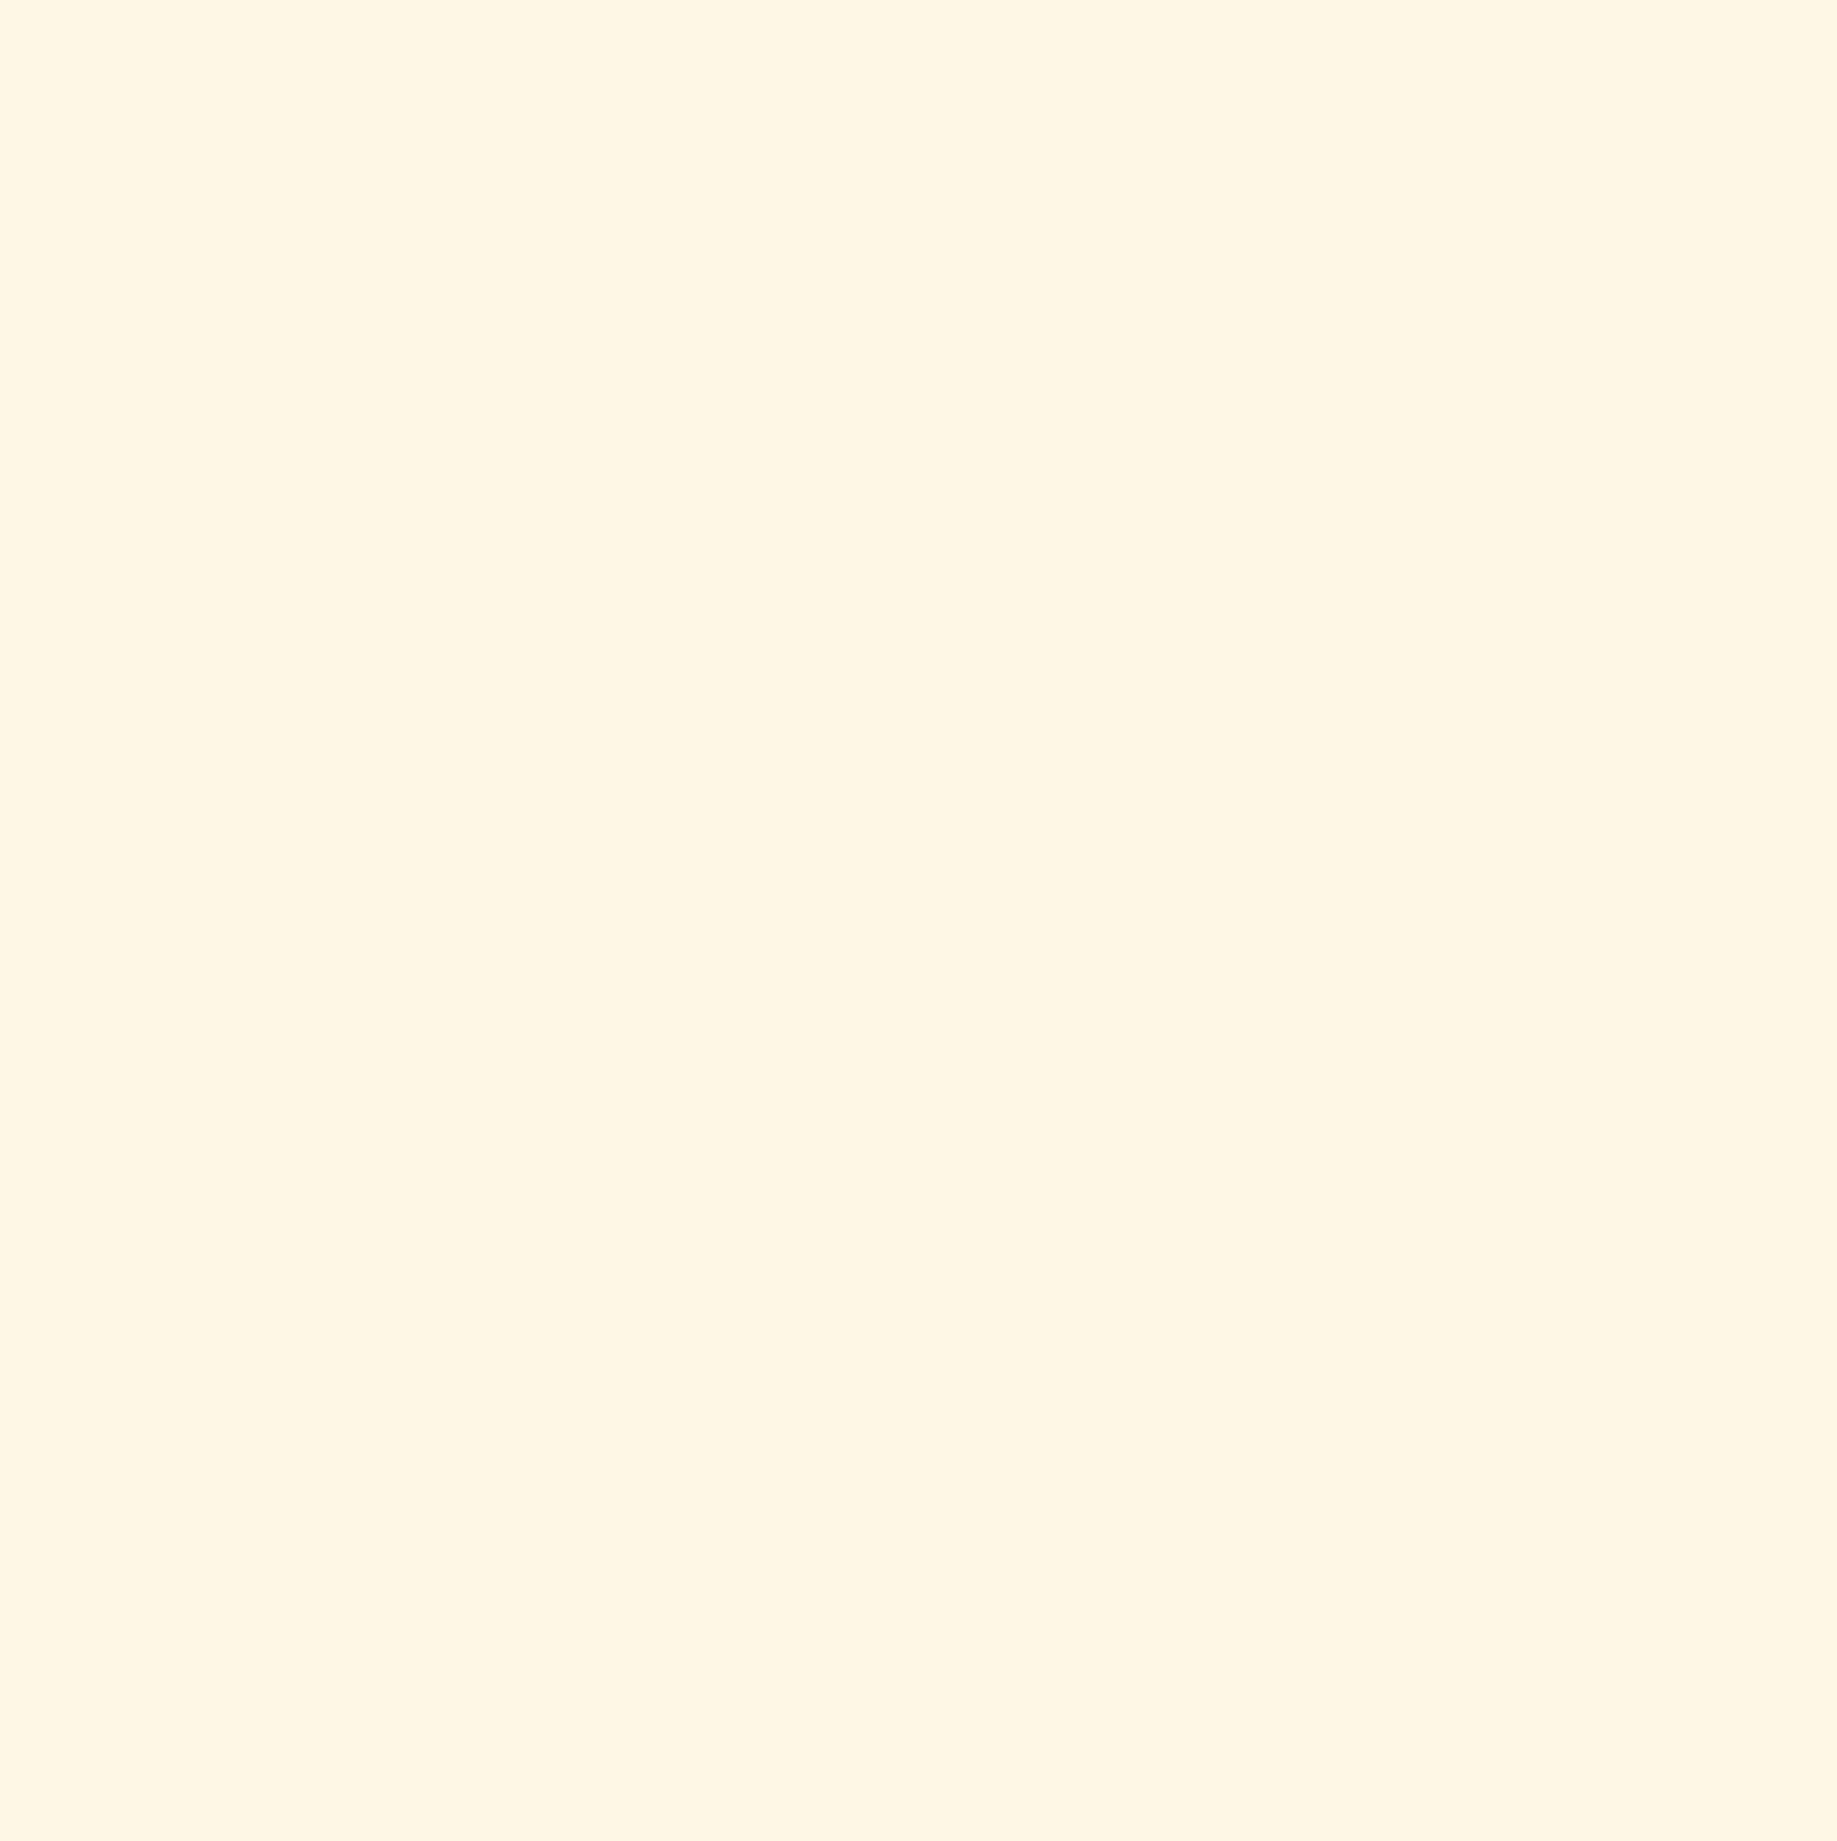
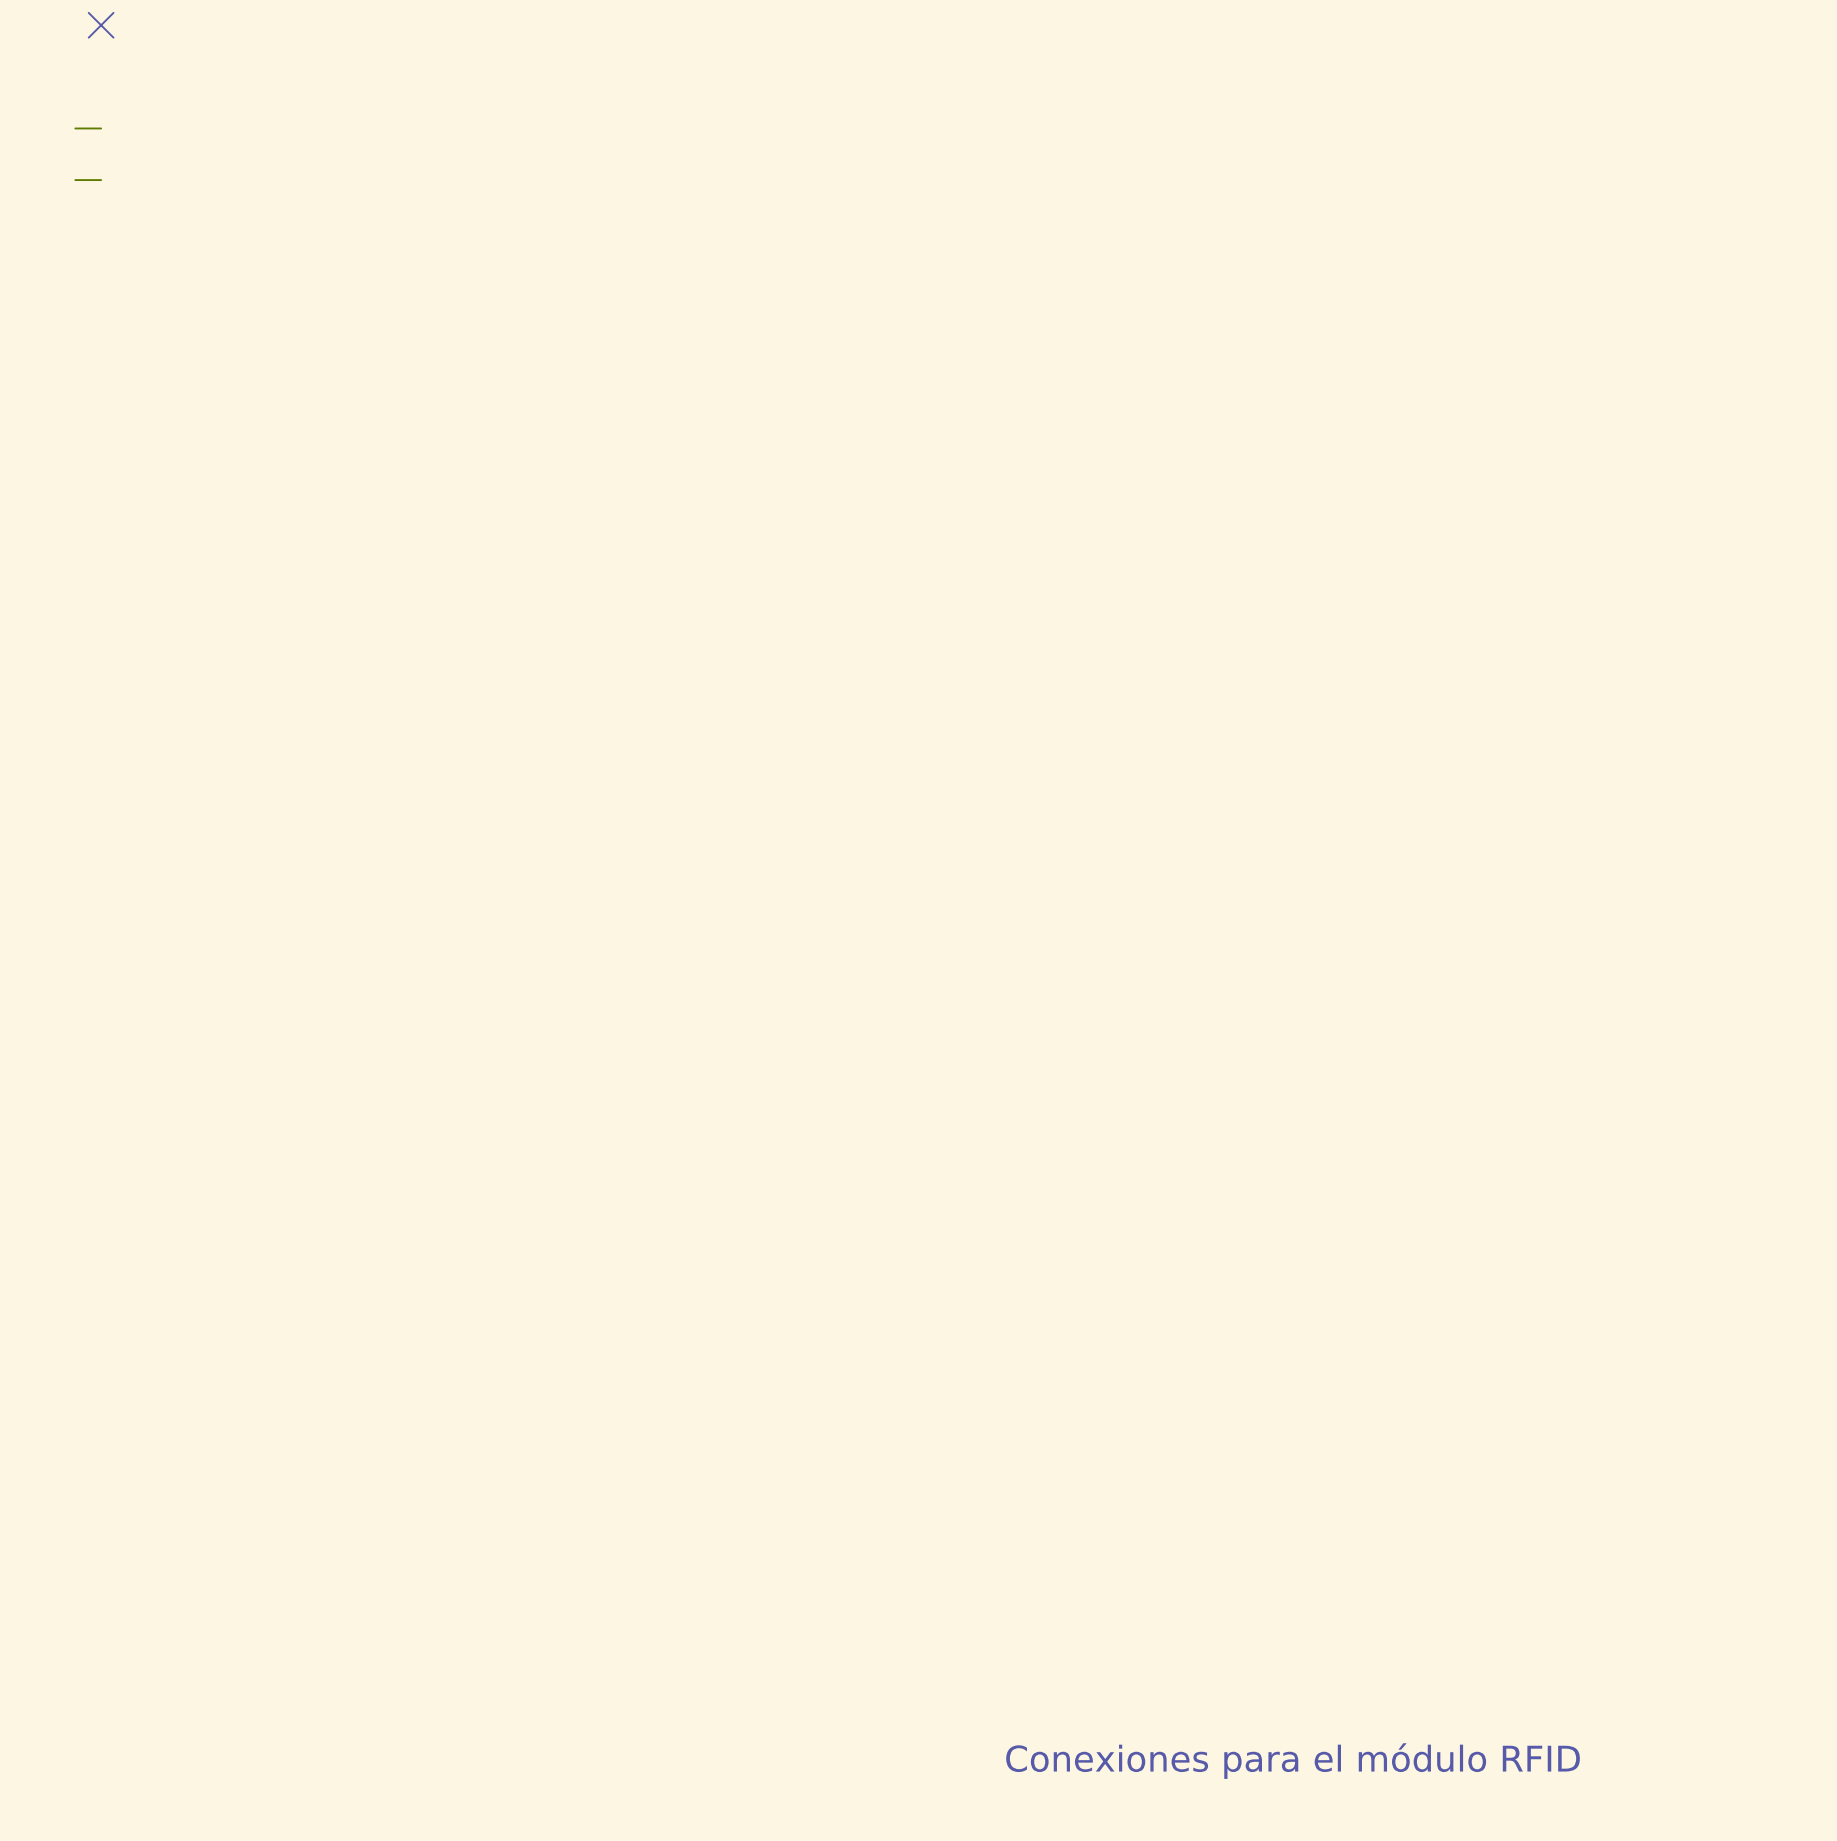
no-connect mark: none -> (101, 25)
wire: none -> (75, 128) (101, 128)
wire: none -> (75, 180) (101, 180)
text: none -> Conexiones para el módulo RFID (1293, 1761)

